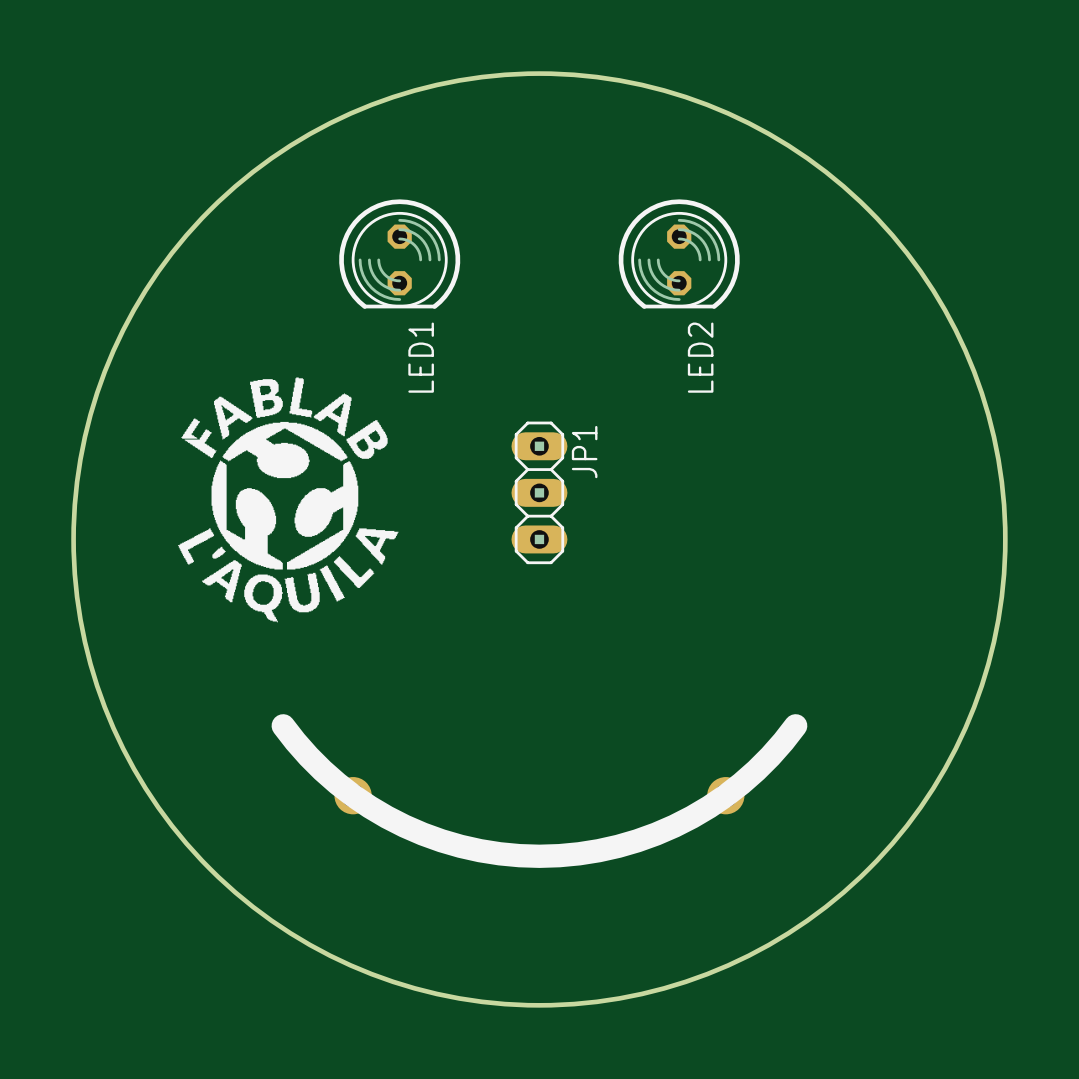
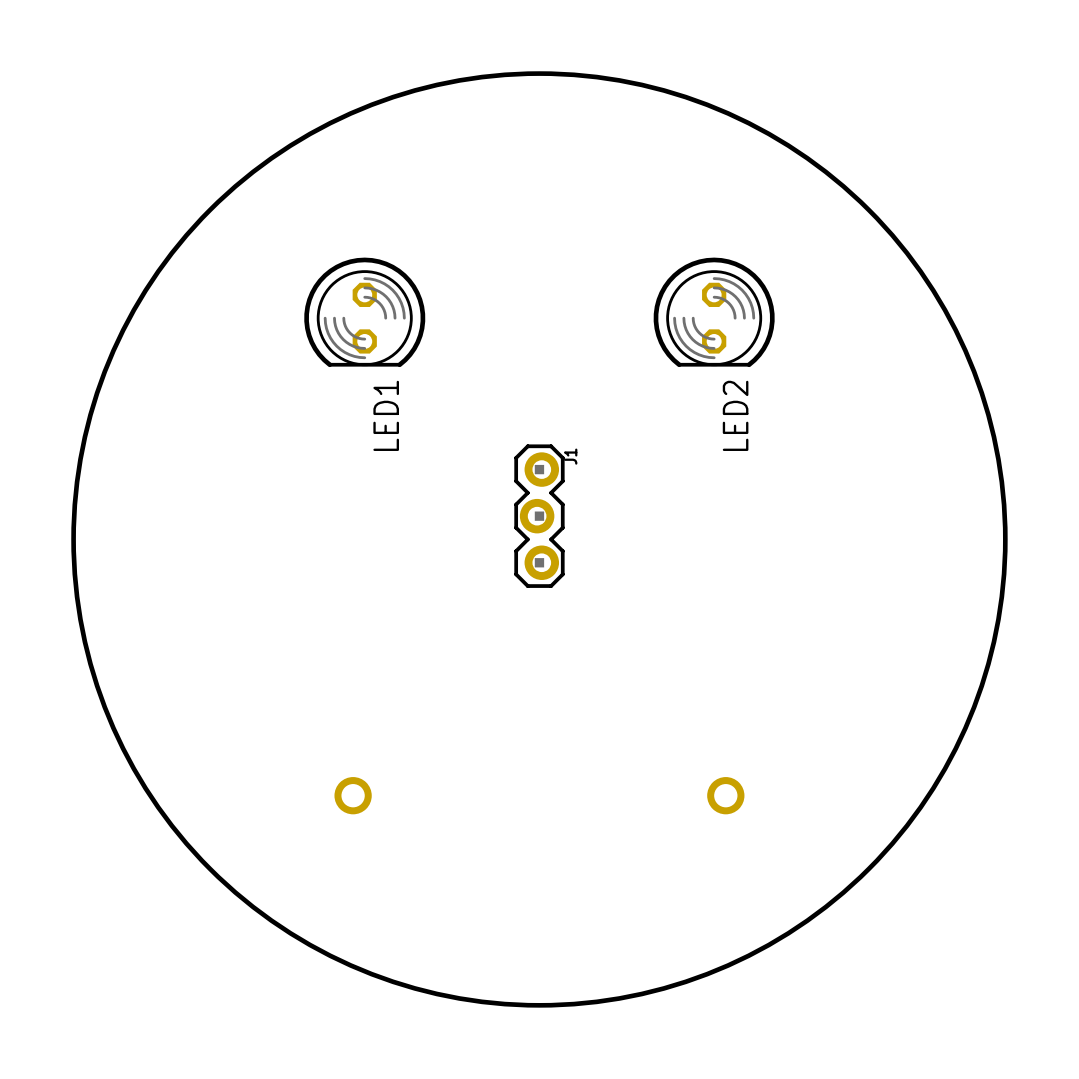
LED1 position: (399, 254) -> (364, 312)
LED2 position: (679, 254) -> (714, 312)
drawing: [177, 377, 399, 623] -> none
JP1: (539, 492) -> none
J1: none -> (539, 516)
line: (283, 725) (308, 756) (337, 783) (369, 807) (404, 826) (441, 840) (480, 850) (539, 856) (598, 850) (637, 840) (674, 826) (709, 807) (741, 783) (770, 756) (795, 725) -> none

